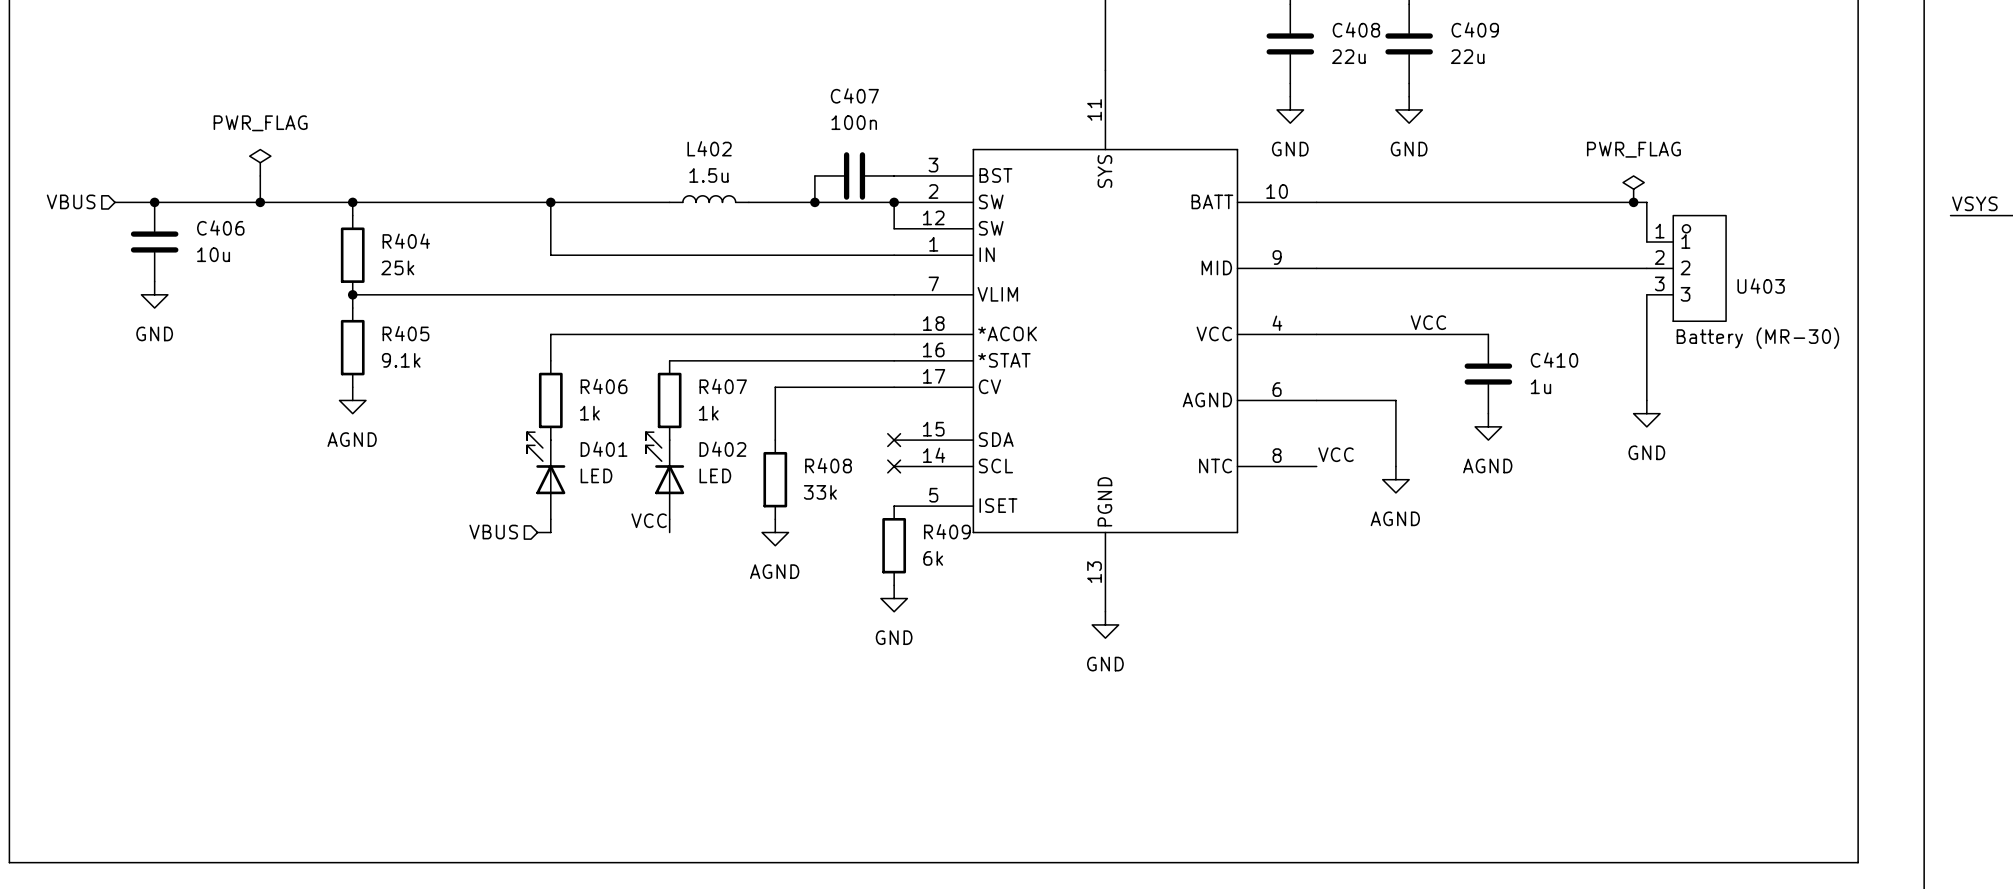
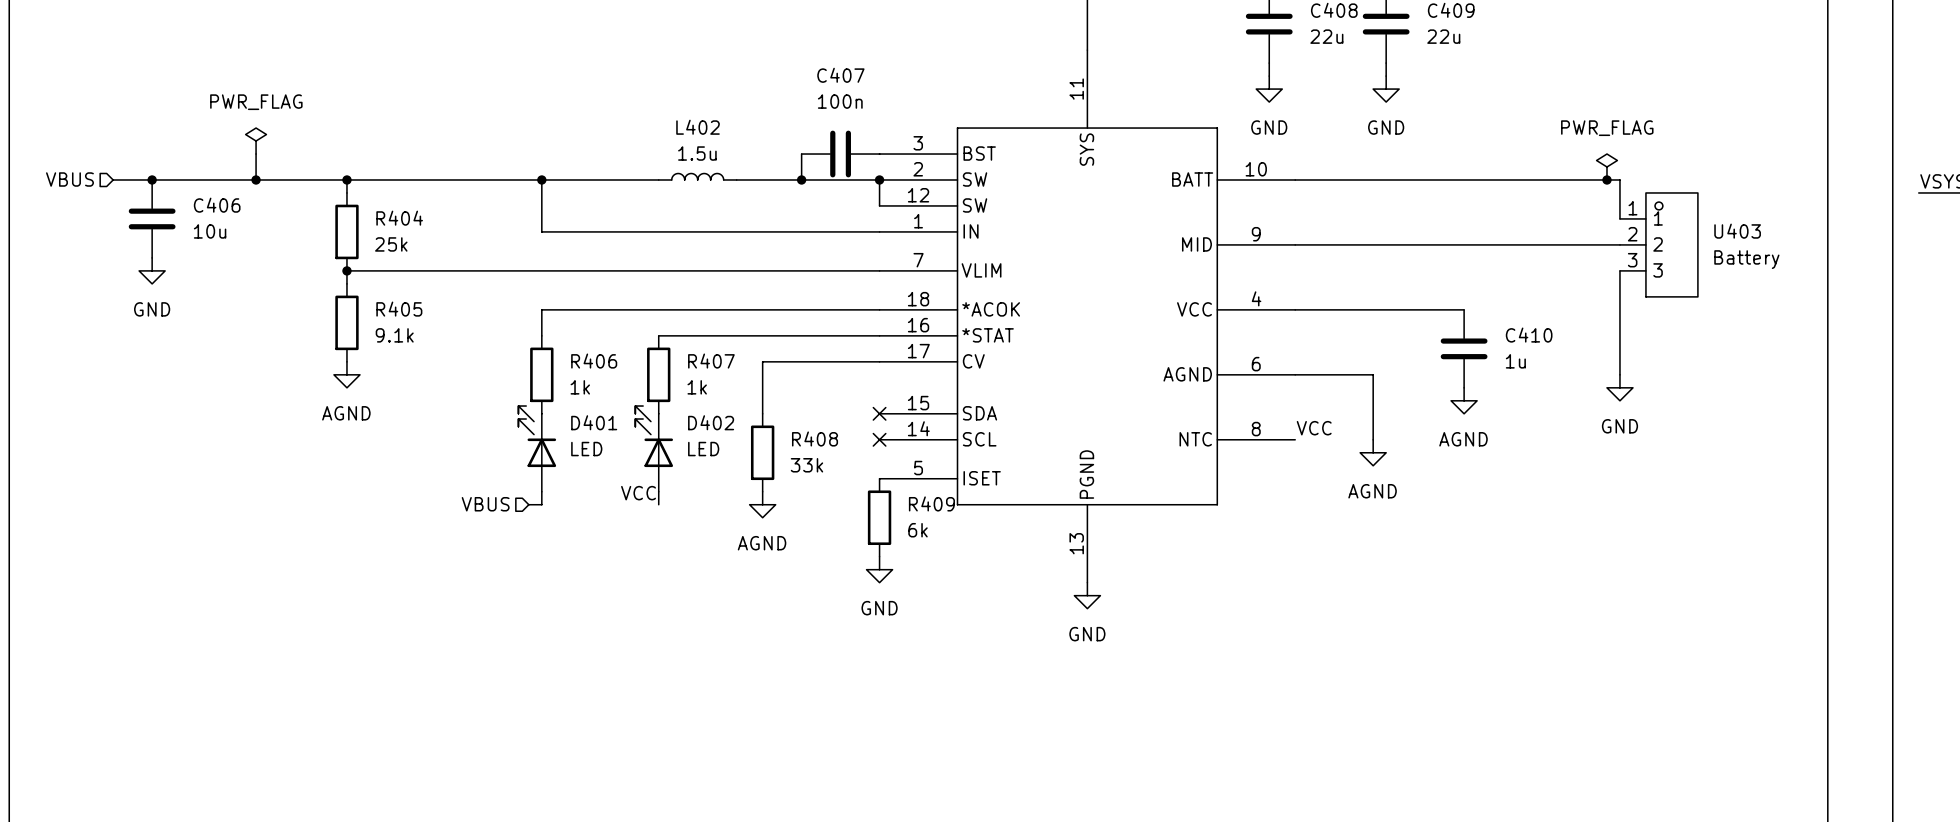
U403 name position: U403 (1761, 286) -> U403 (1737, 231)
label: VCC (1428, 322) -> none
U403 value: Battery (MR-30) (1757, 338) -> Battery (1746, 259)

